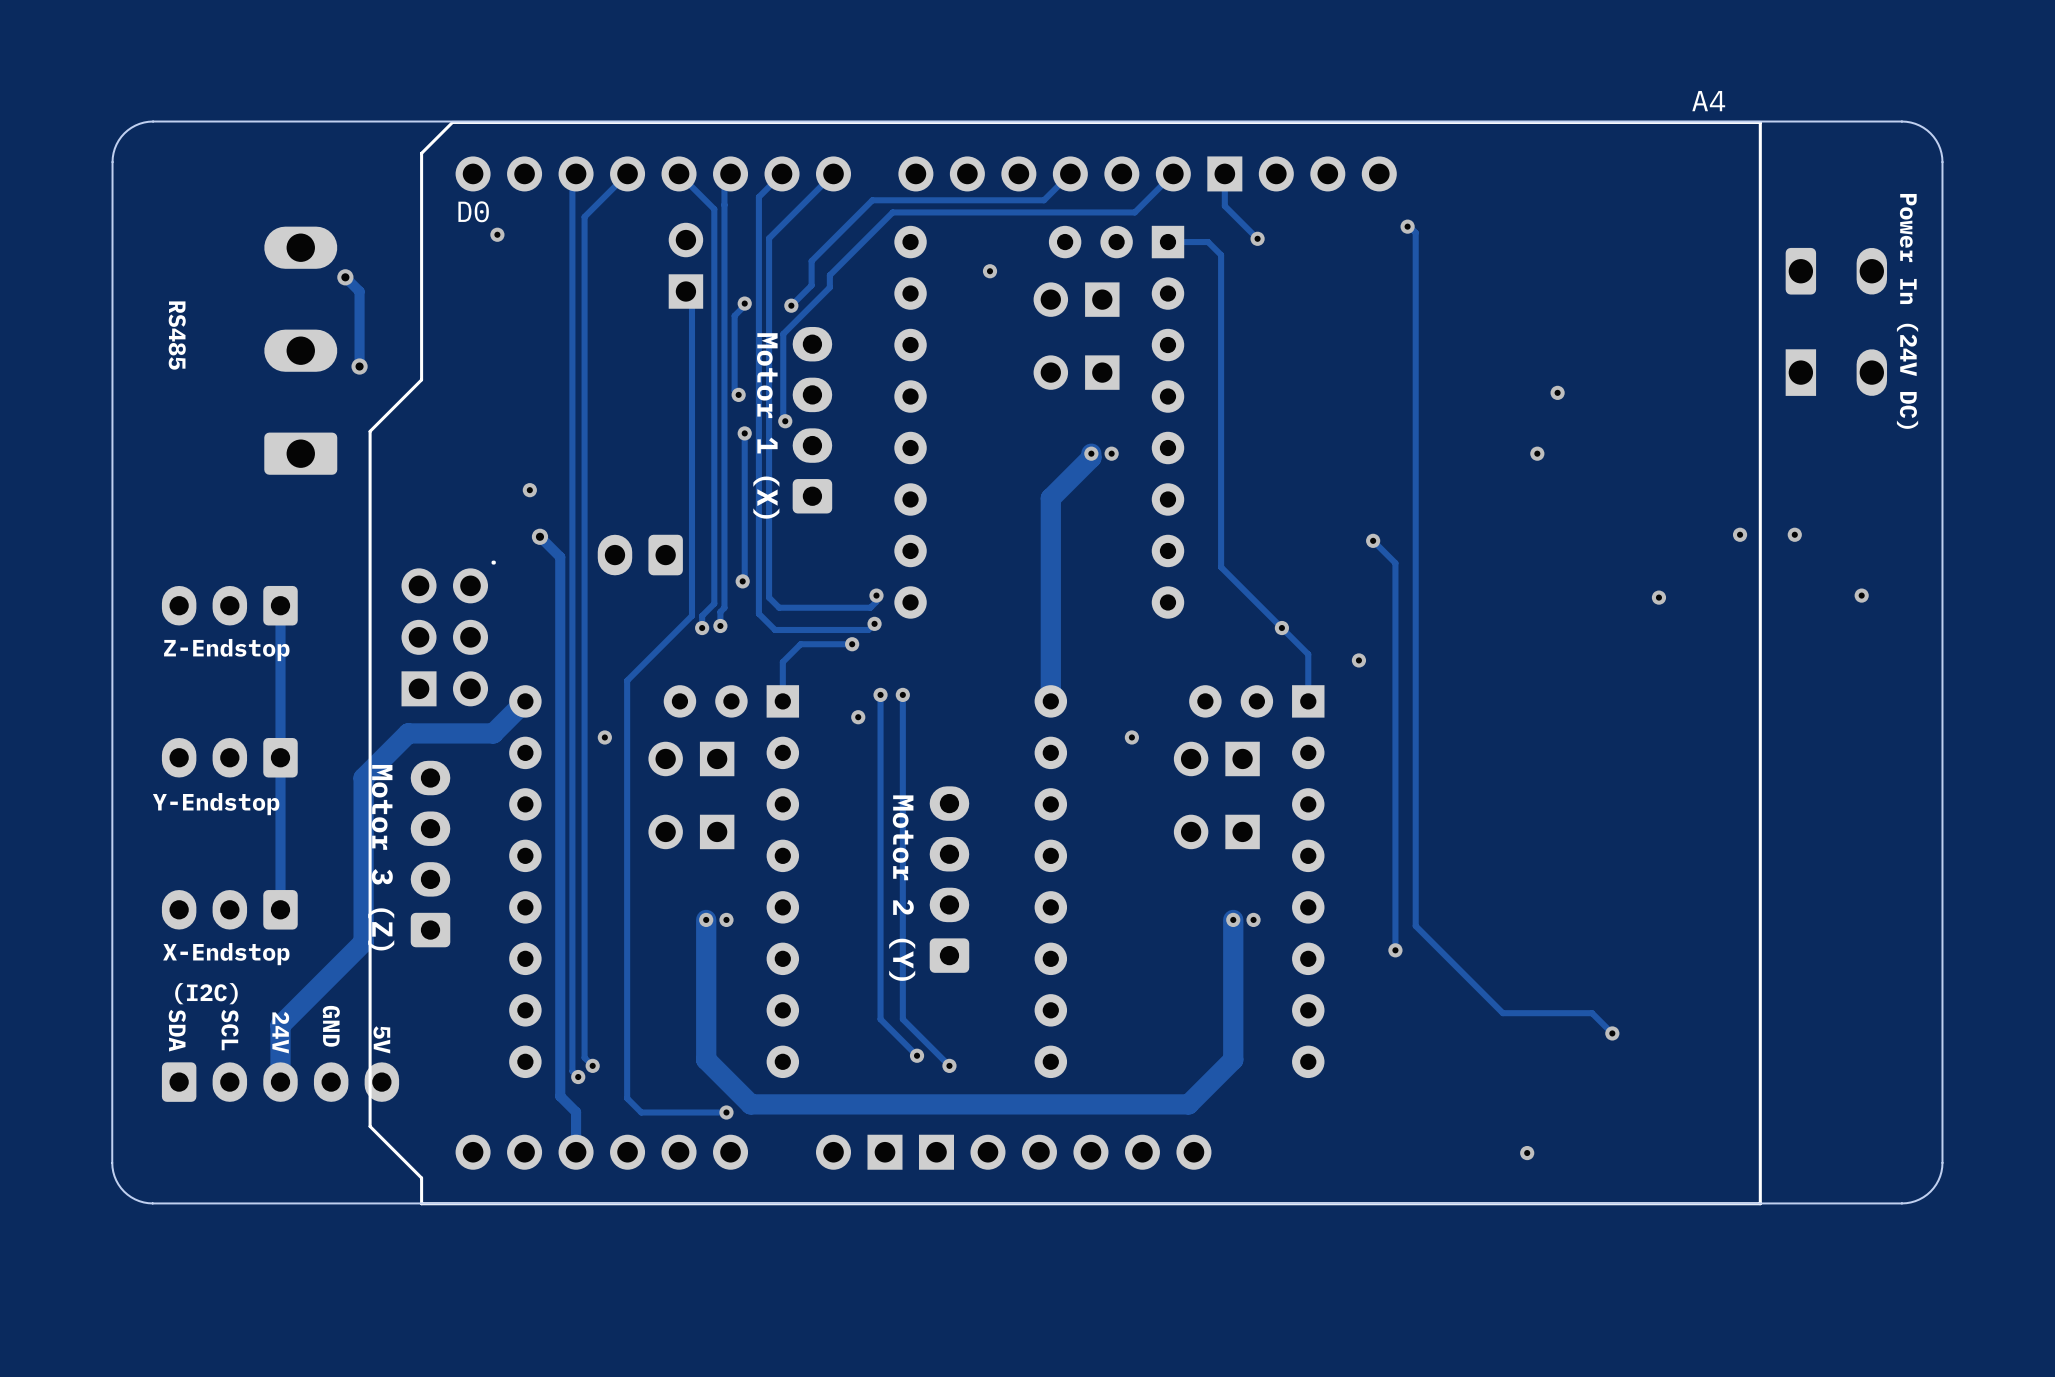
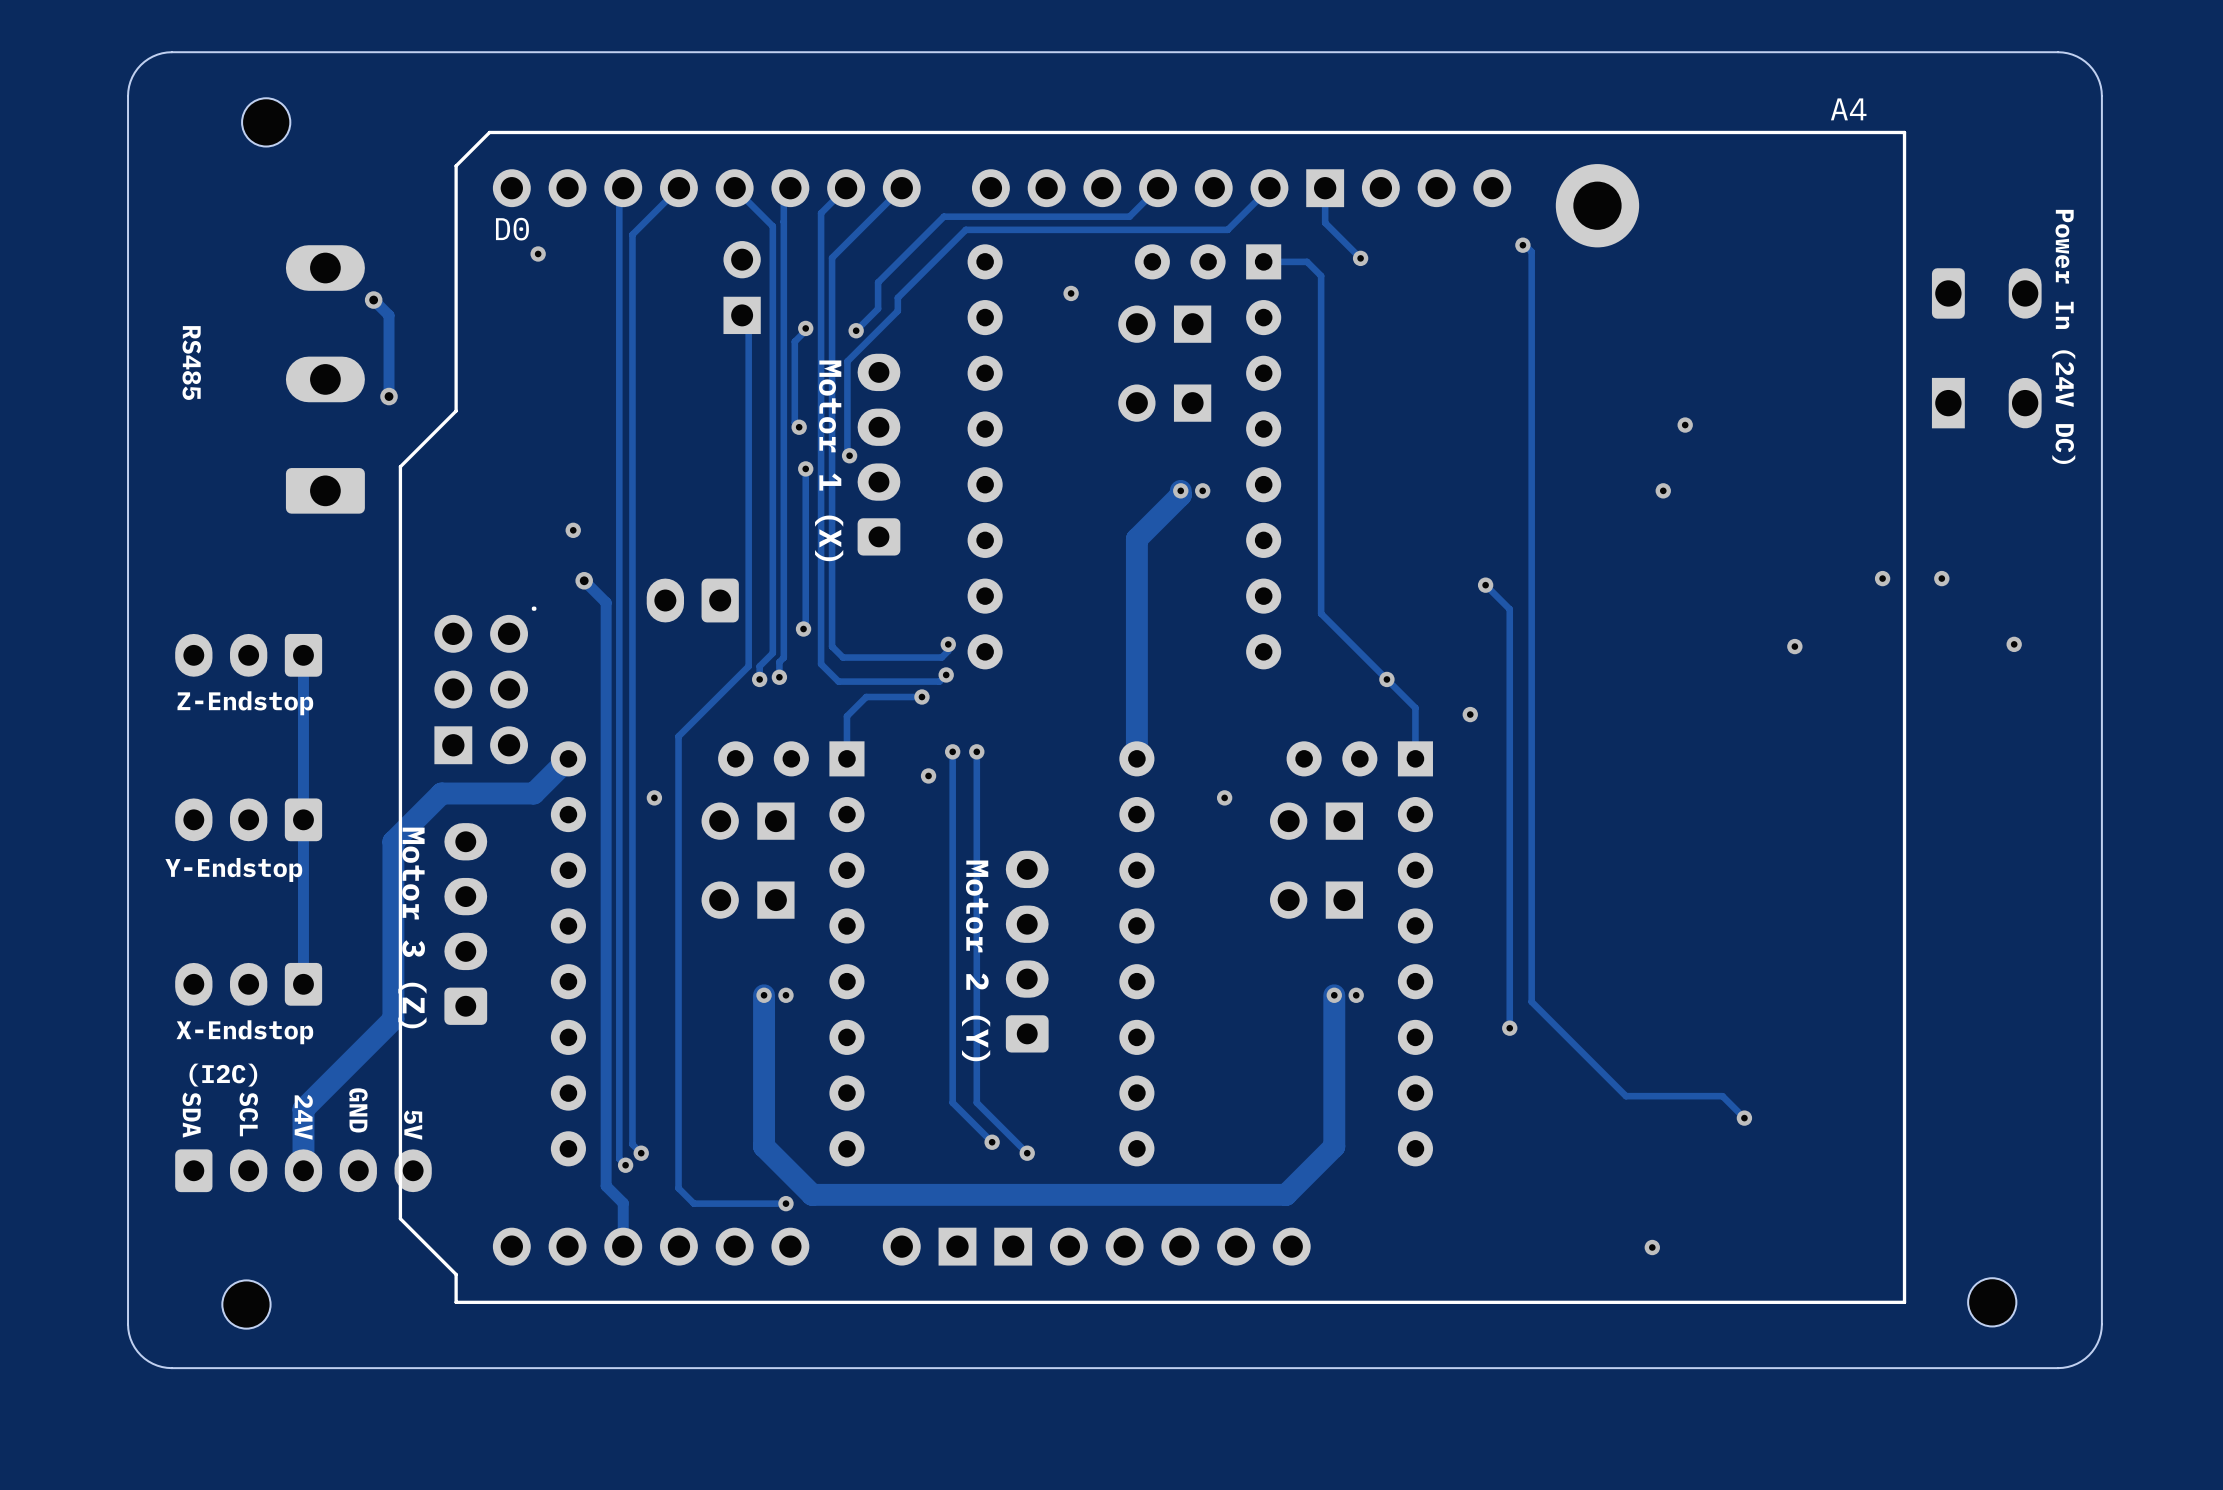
part: none -> (266, 122)
part: none -> (1597, 205)
board edge: (152, 1203) (148, 1203) (143, 1202) (135, 1199) (124, 1191) (116, 1180) (112, 1162) (112, 162) (116, 144) (121, 136) (131, 127) (144, 122) (153, 121) (1901, 121) (1919, 125) (1930, 133) (1936, 140) (1941, 153) (1942, 162) (1942, 1162) (1938, 1180) (1933, 1188) (1923, 1197) (1910, 1202) (1901, 1203) (152, 1203) -> (2058, 52) (2077, 56) (2089, 65) (2099, 81) (2101, 96) (2101, 1324) (2099, 1338) (2095, 1347) (2081, 1361) (2072, 1365) (2058, 1368) (171, 1368) (157, 1365) (148, 1361) (134, 1347) (130, 1338) (128, 1324) (128, 96) (132, 77) (140, 65) (148, 58) (157, 54) (171, 52) (2058, 52)
part: none -> (1992, 1302)
part: none -> (246, 1304)

